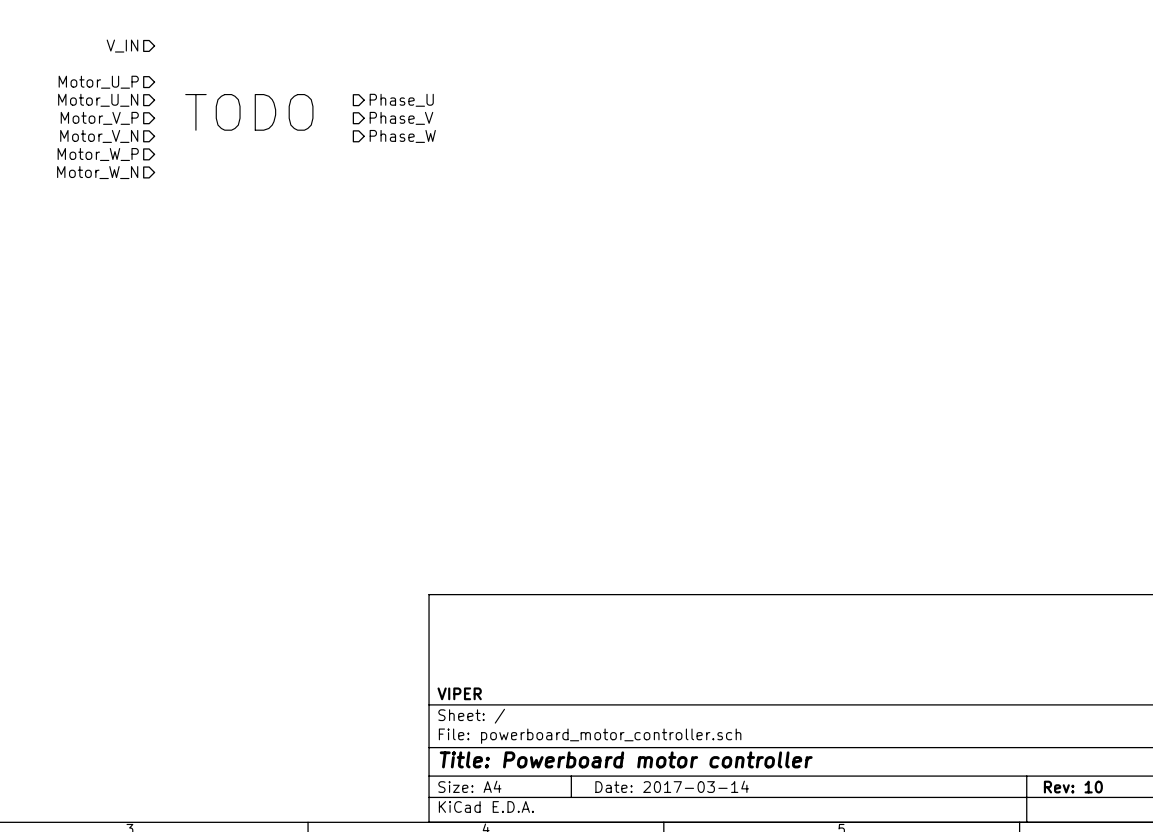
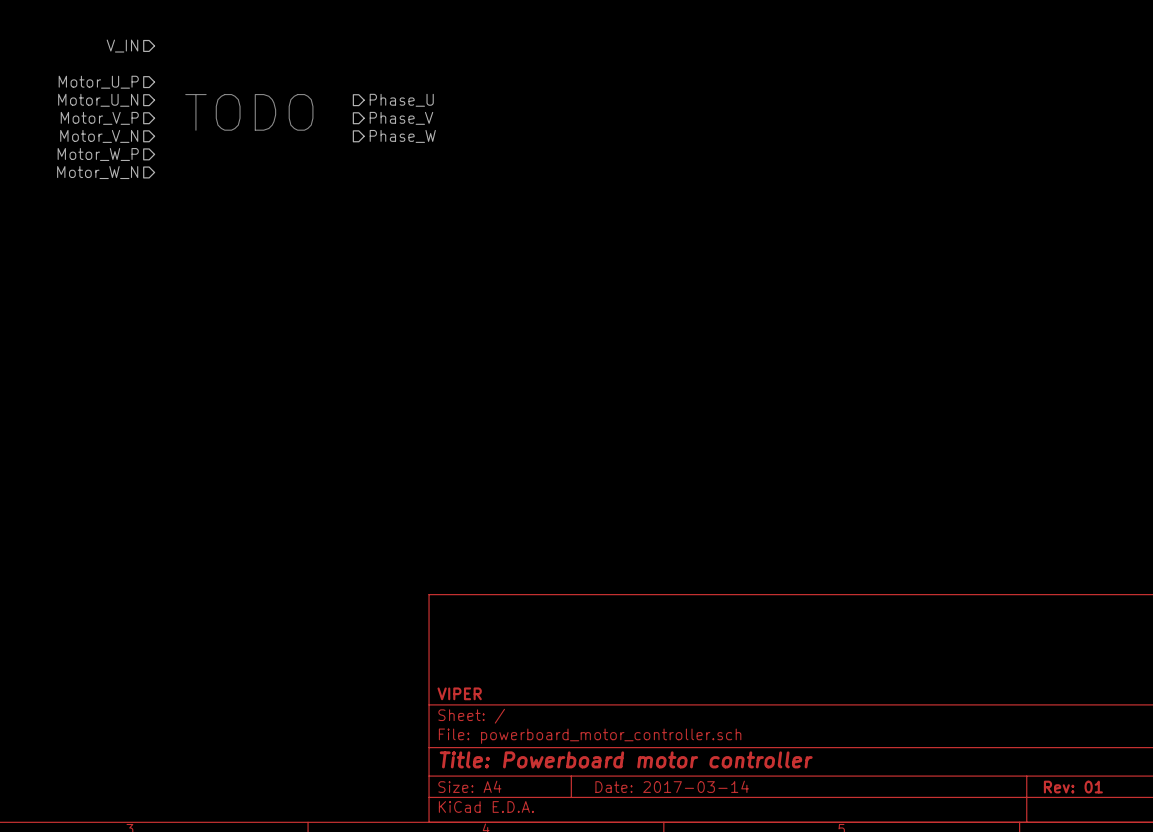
title block: Rev: 10 (1073, 787) -> Rev: 01 (1073, 787)

